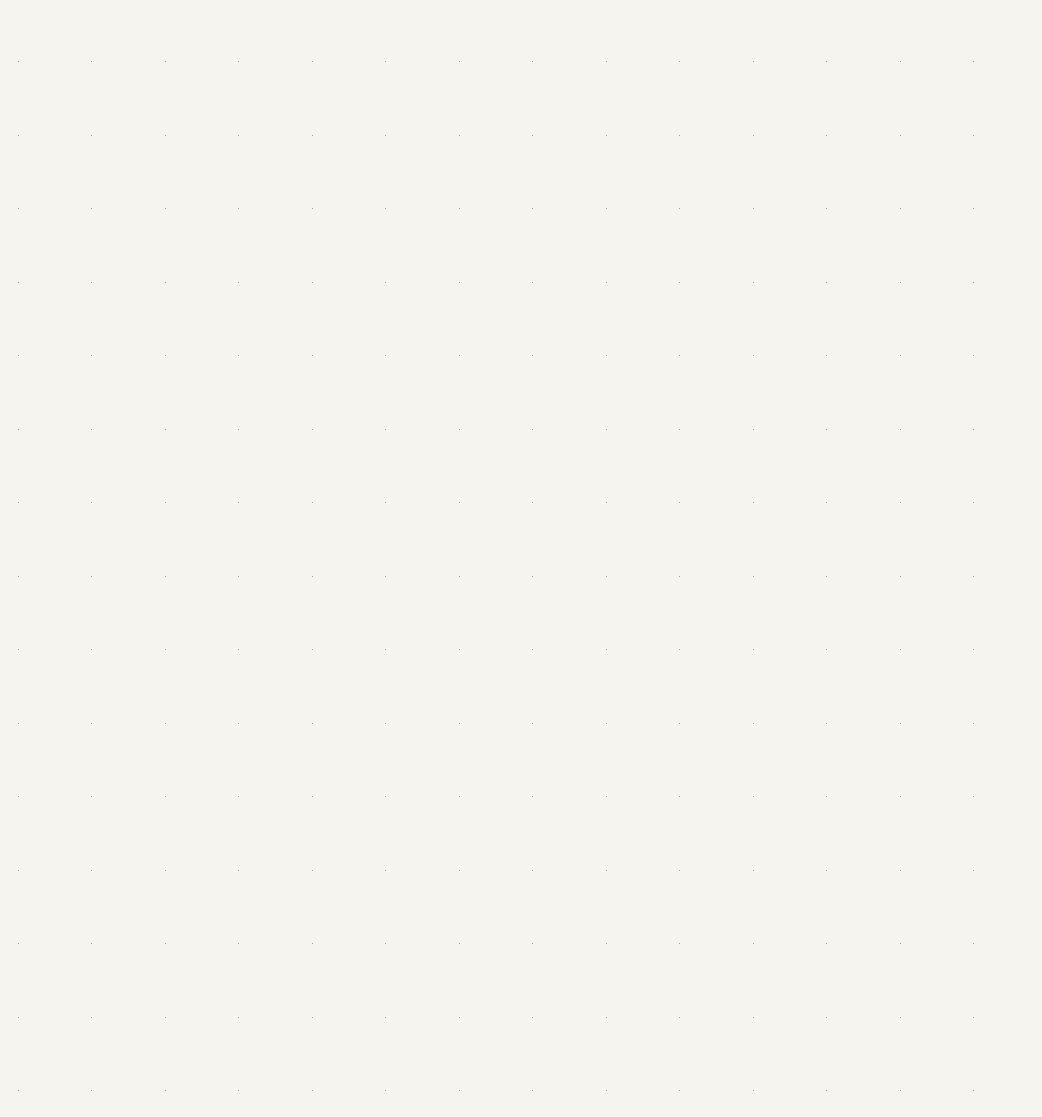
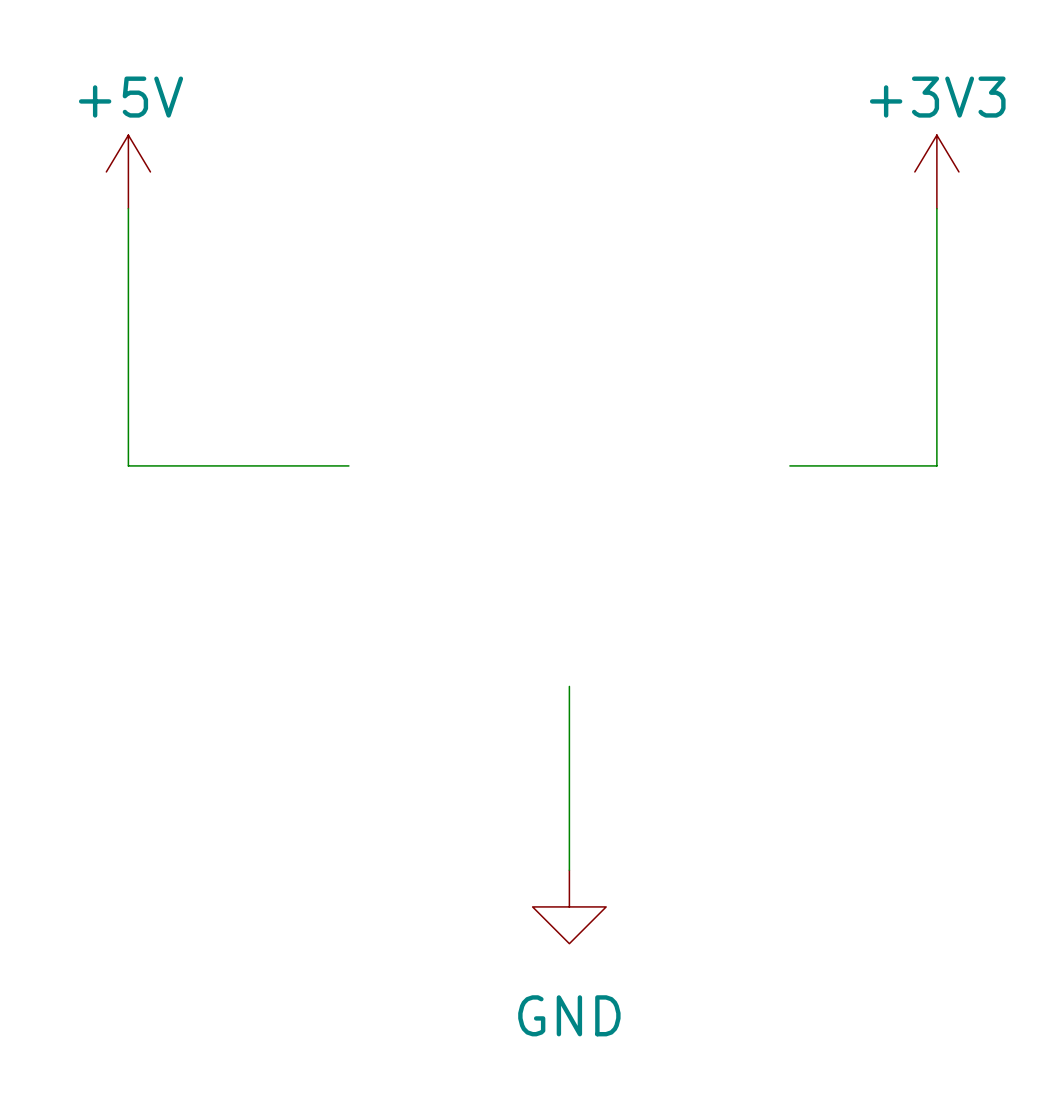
power symbol: none -> +5V (128, 171)
power symbol: none -> +3V3 (936, 171)
wire: none -> (128, 208) (128, 465) (348, 465)
wire: none -> (936, 208) (936, 465) (789, 465)
wire: none -> (569, 686) (569, 870)
power symbol: none -> GND (569, 906)

